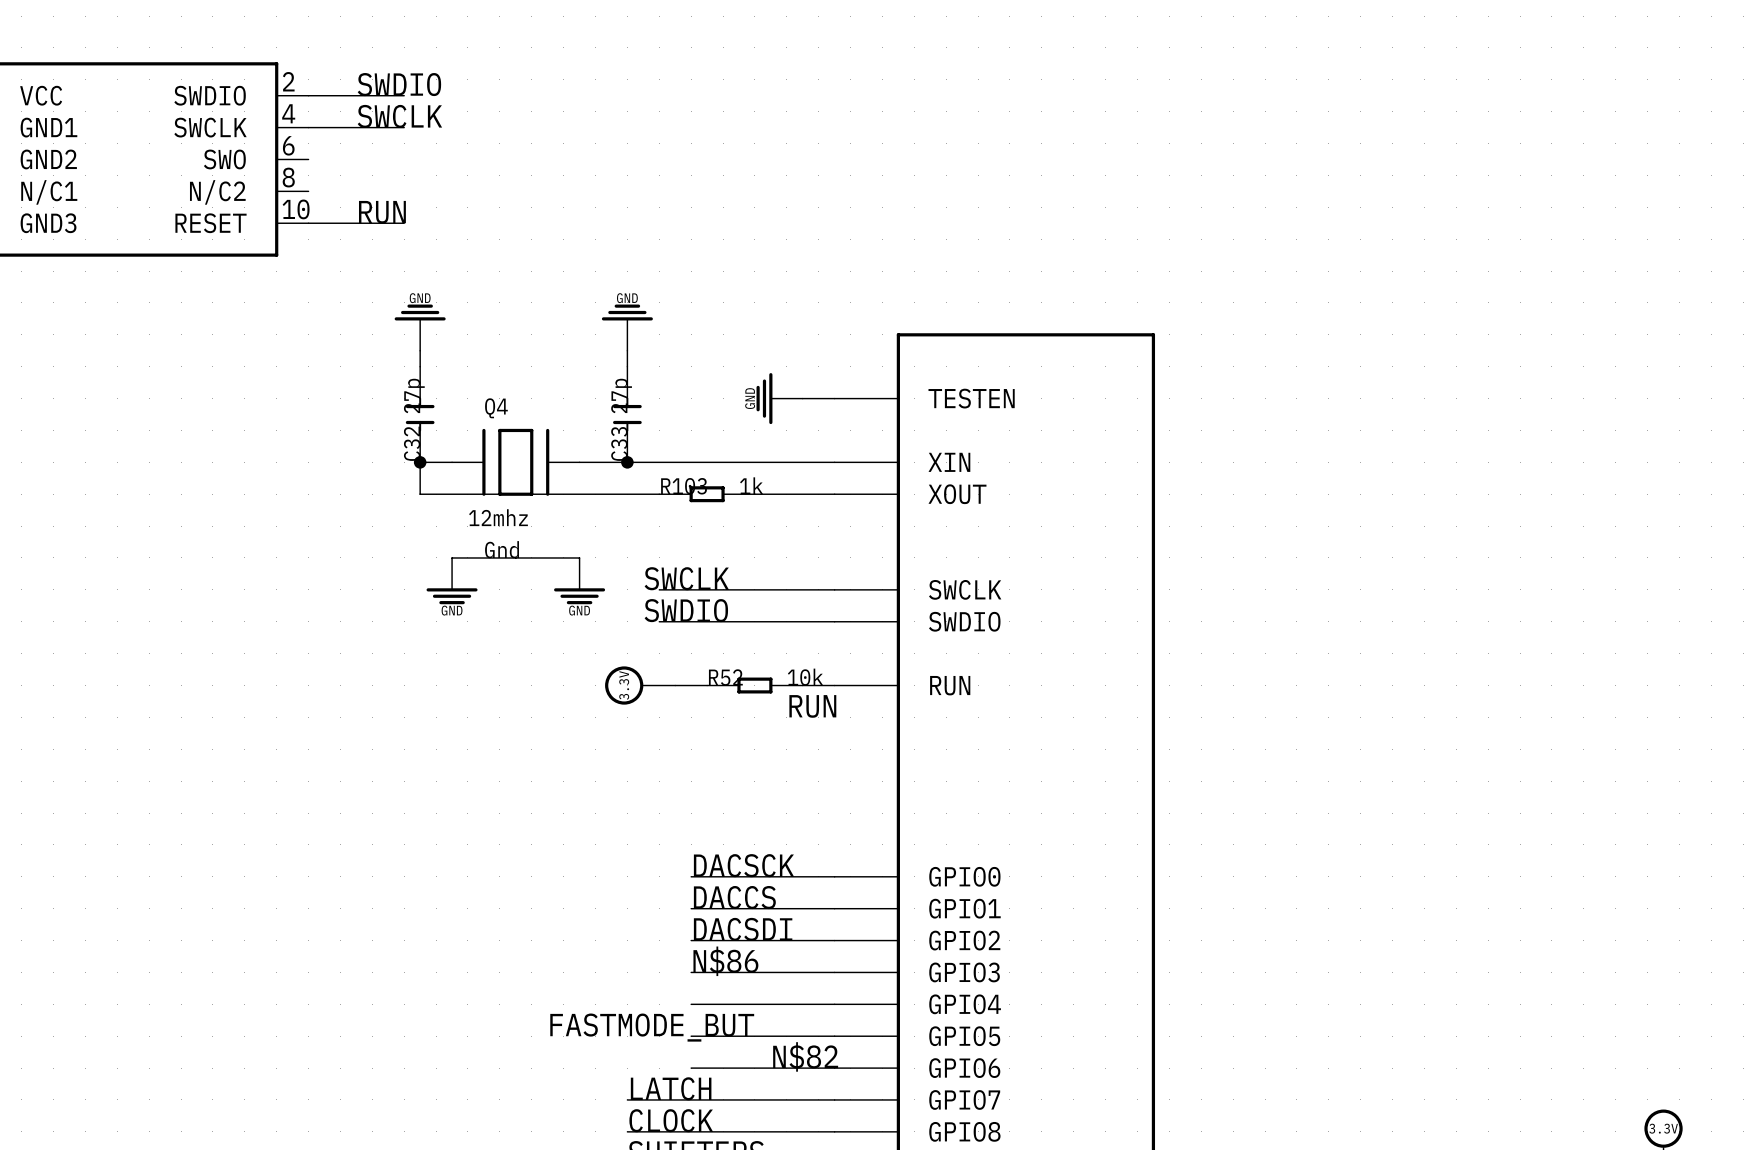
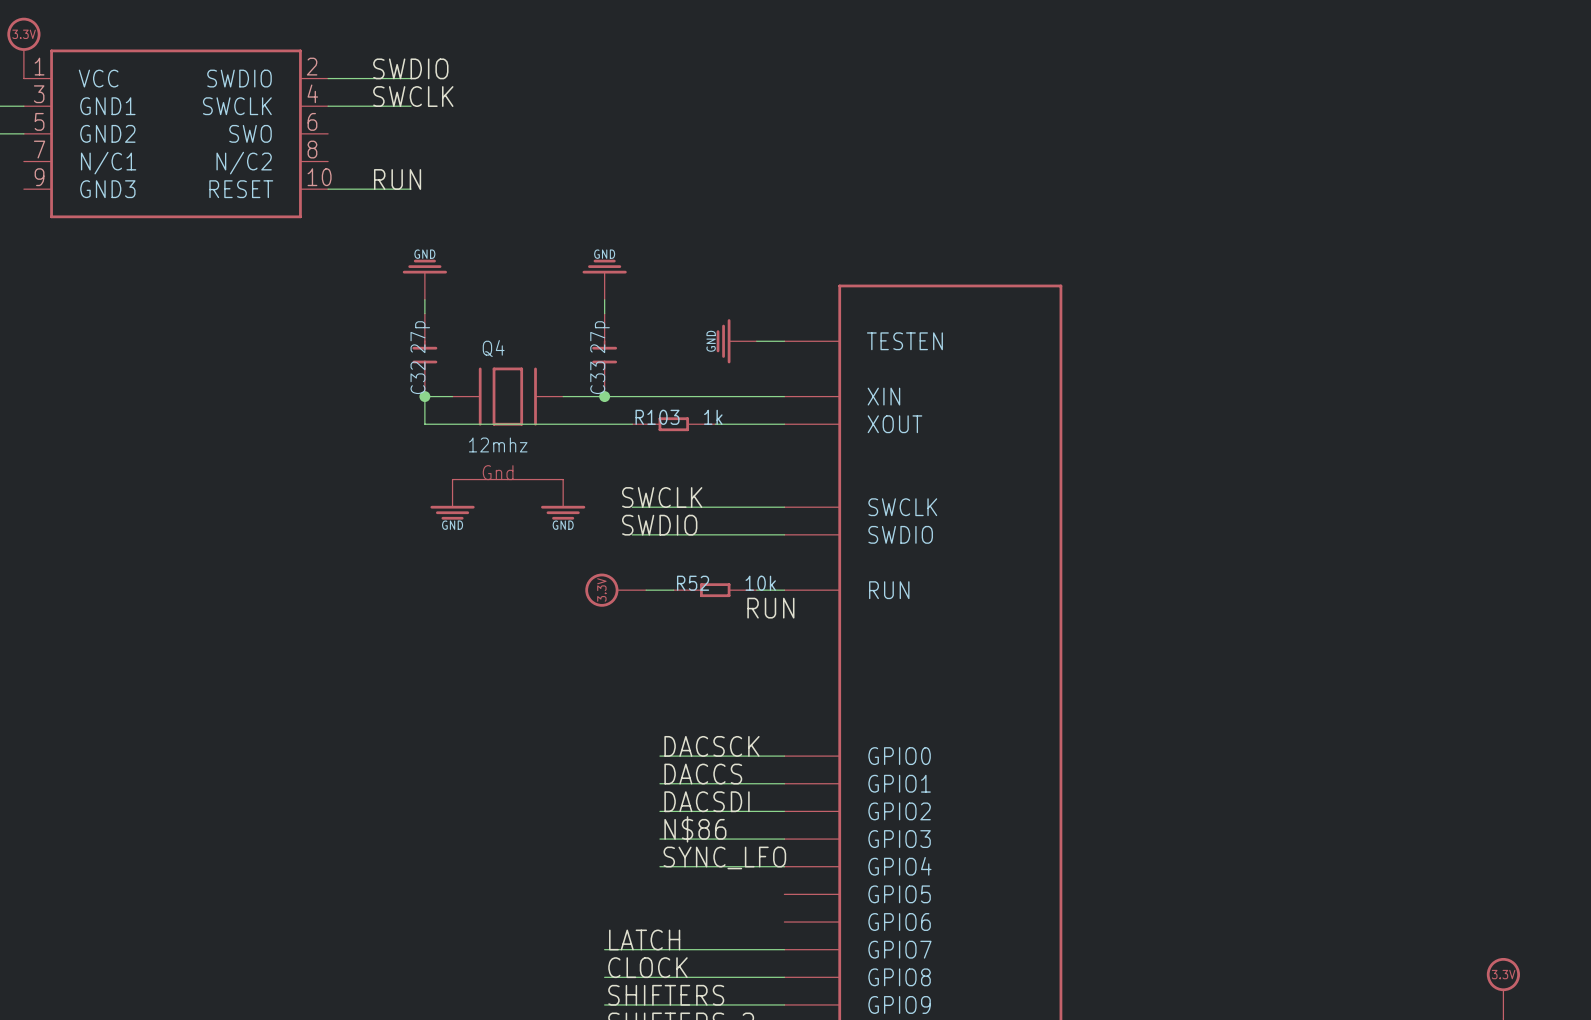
label: none -> SYNC_LFO (724, 857)
label: FASTMODE_BUT (652, 1027) -> none
wire: (691, 1036) (834, 1036) -> none
label: N$82 (805, 1056) -> none
wire: (691, 1068) (834, 1068) -> none

